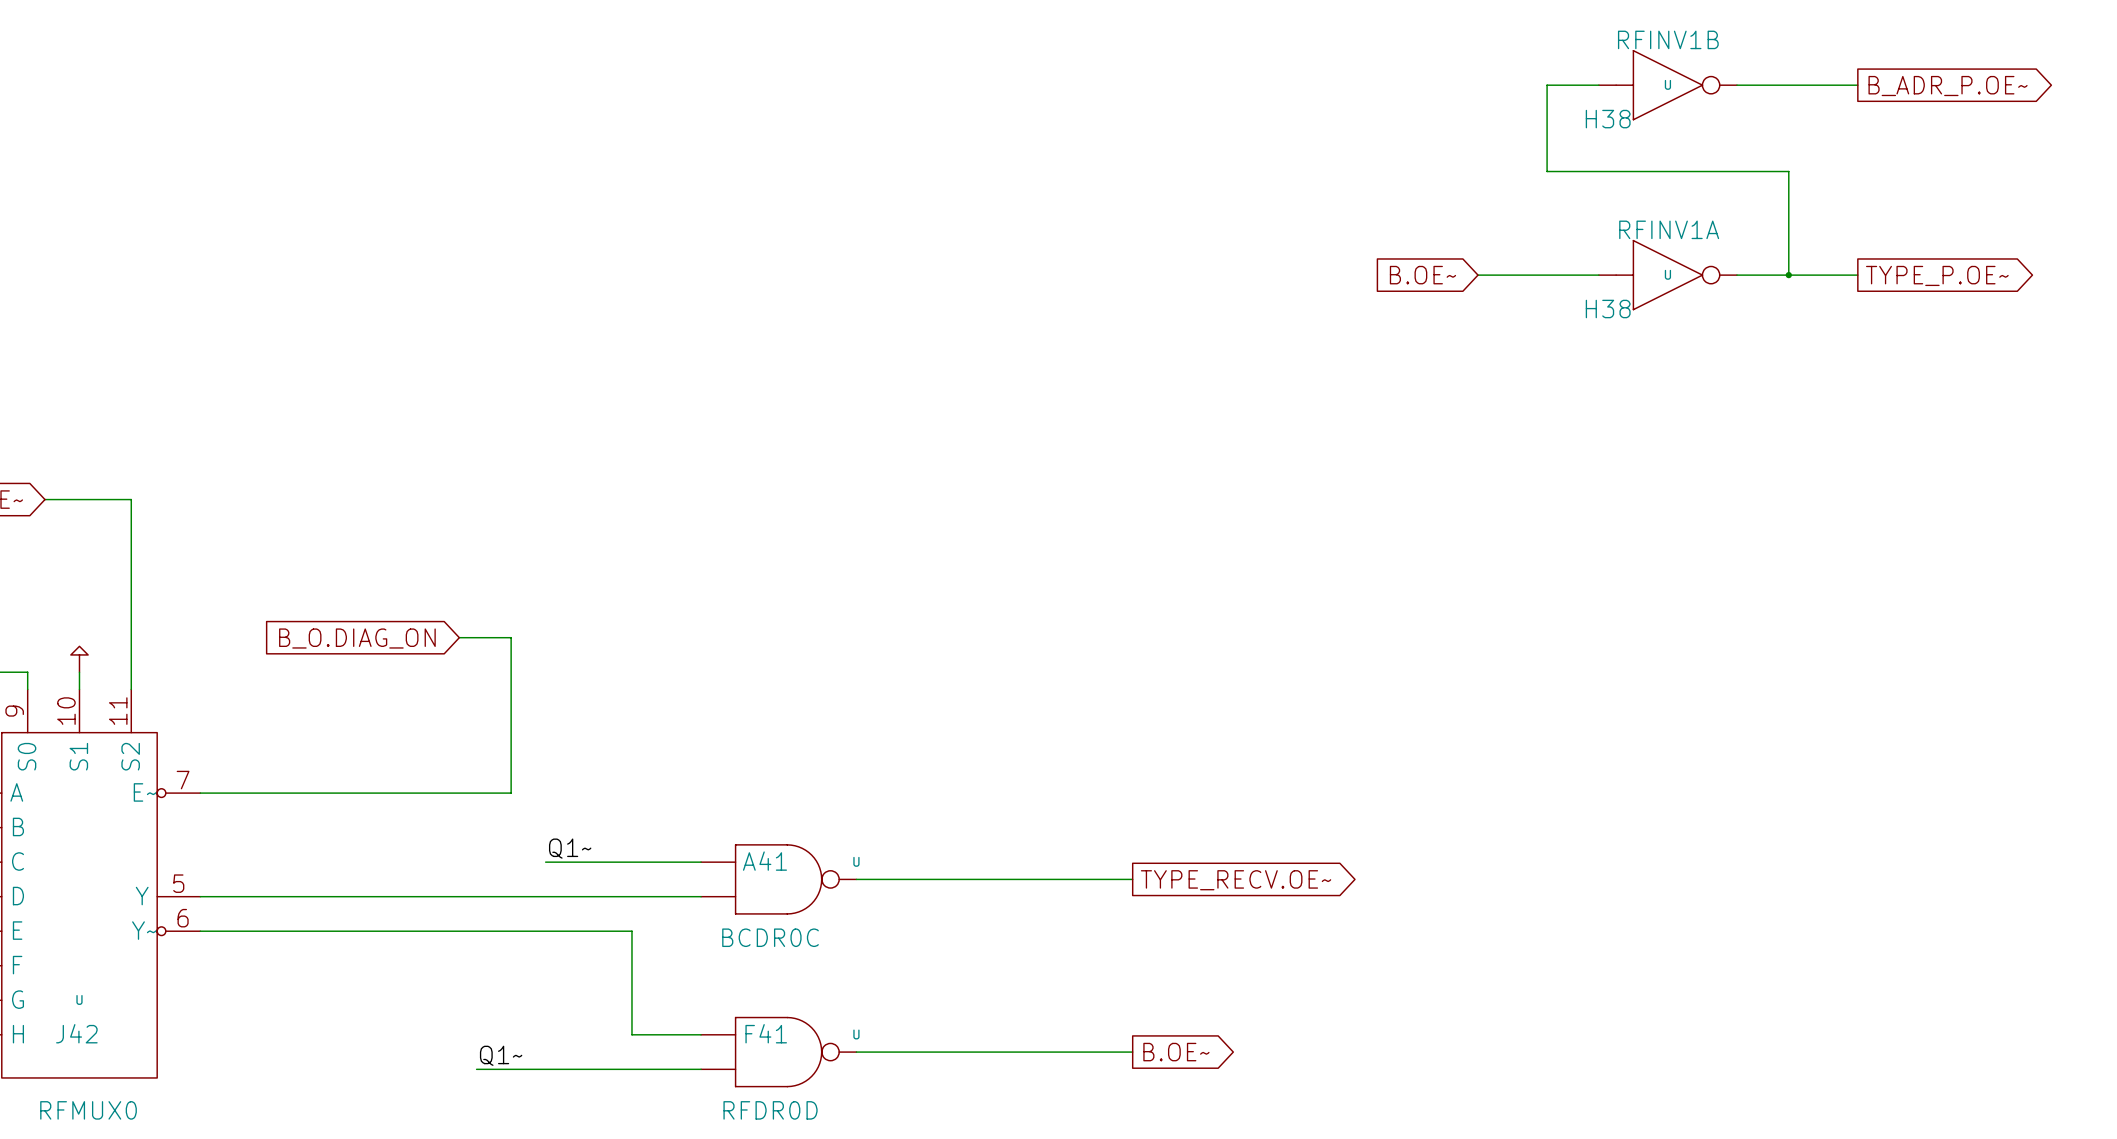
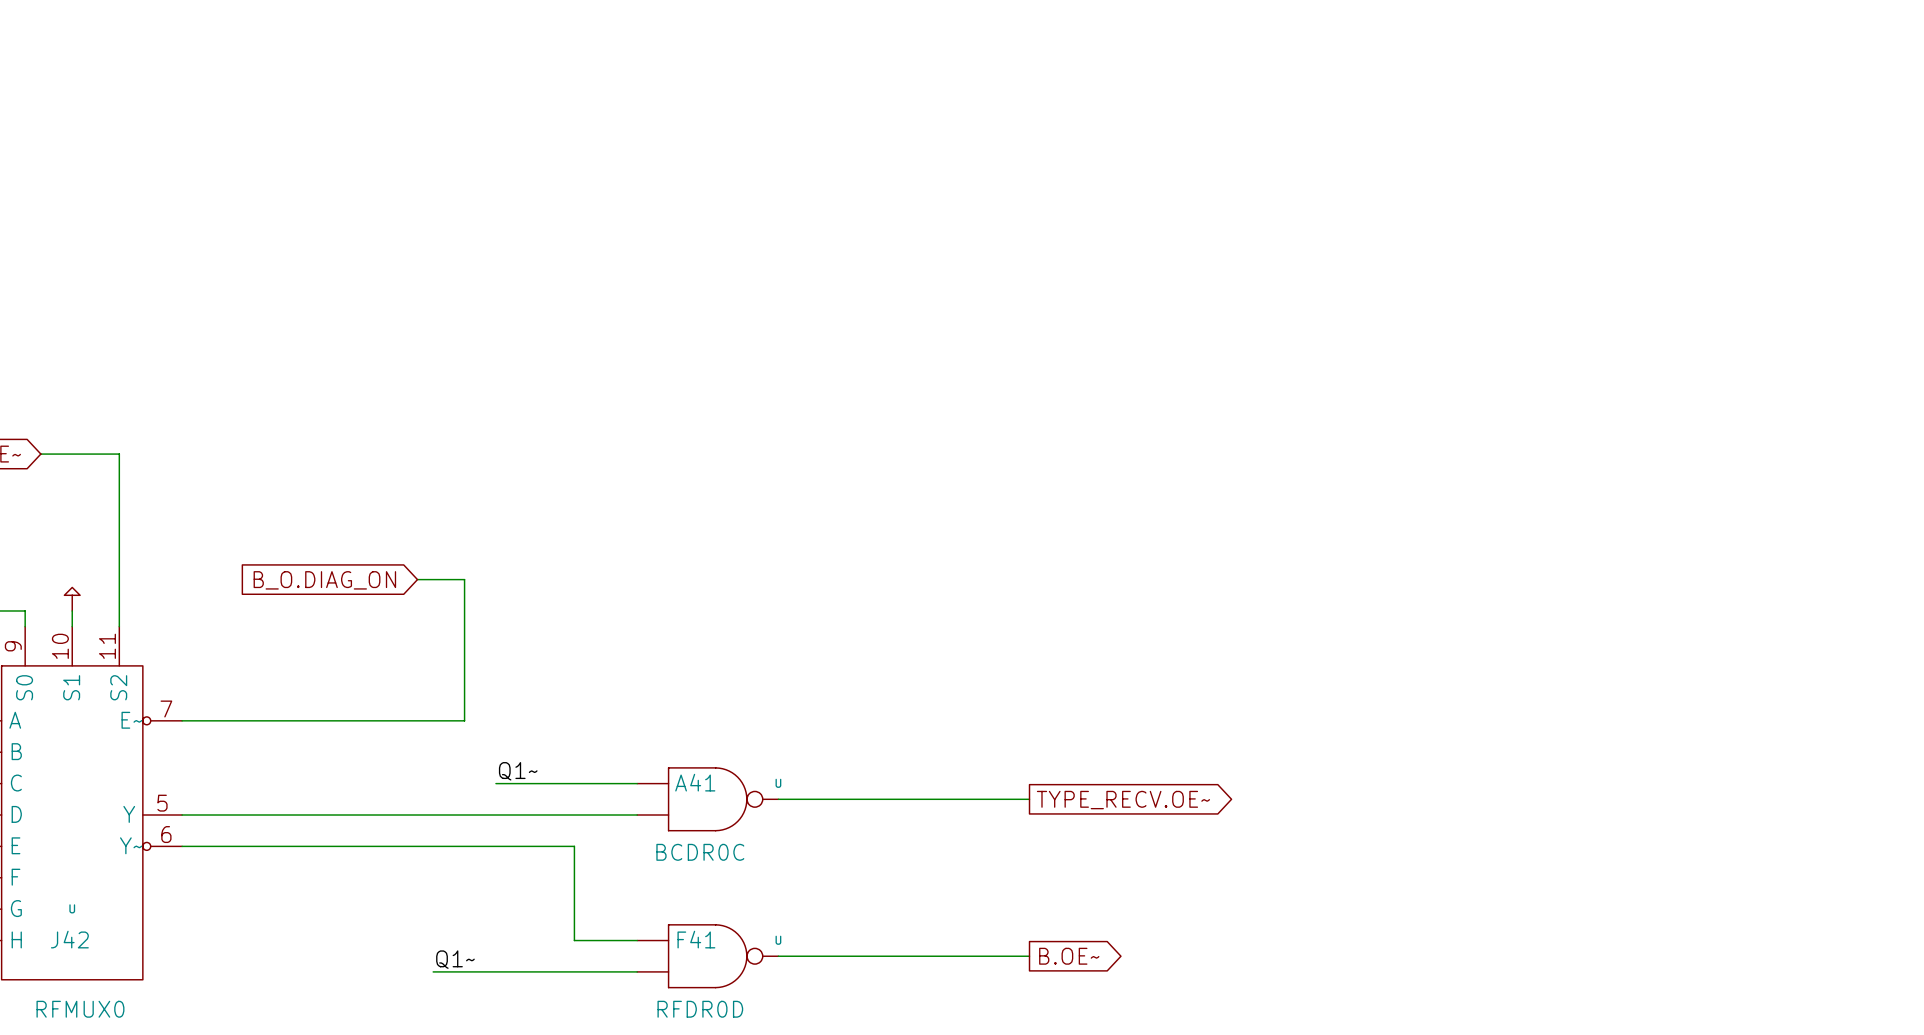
wire: (1598, 85) (1547, 85) (1547, 171) (1788, 171) (1788, 275) -> none
U: (1667, 85) -> none
wire: (1736, 85) (1857, 85) -> none
global label: B_ADR_P.OE~ (1948, 86) -> none
global label: B.OE~ (1422, 275) -> none
wire: (1478, 275) (1598, 275) -> none
U: (1667, 275) -> none
wire: (1736, 275) (1857, 275) -> none
junction: (1788, 275) -> none
global label: TYPE_P.OE~ (1937, 275) -> none

